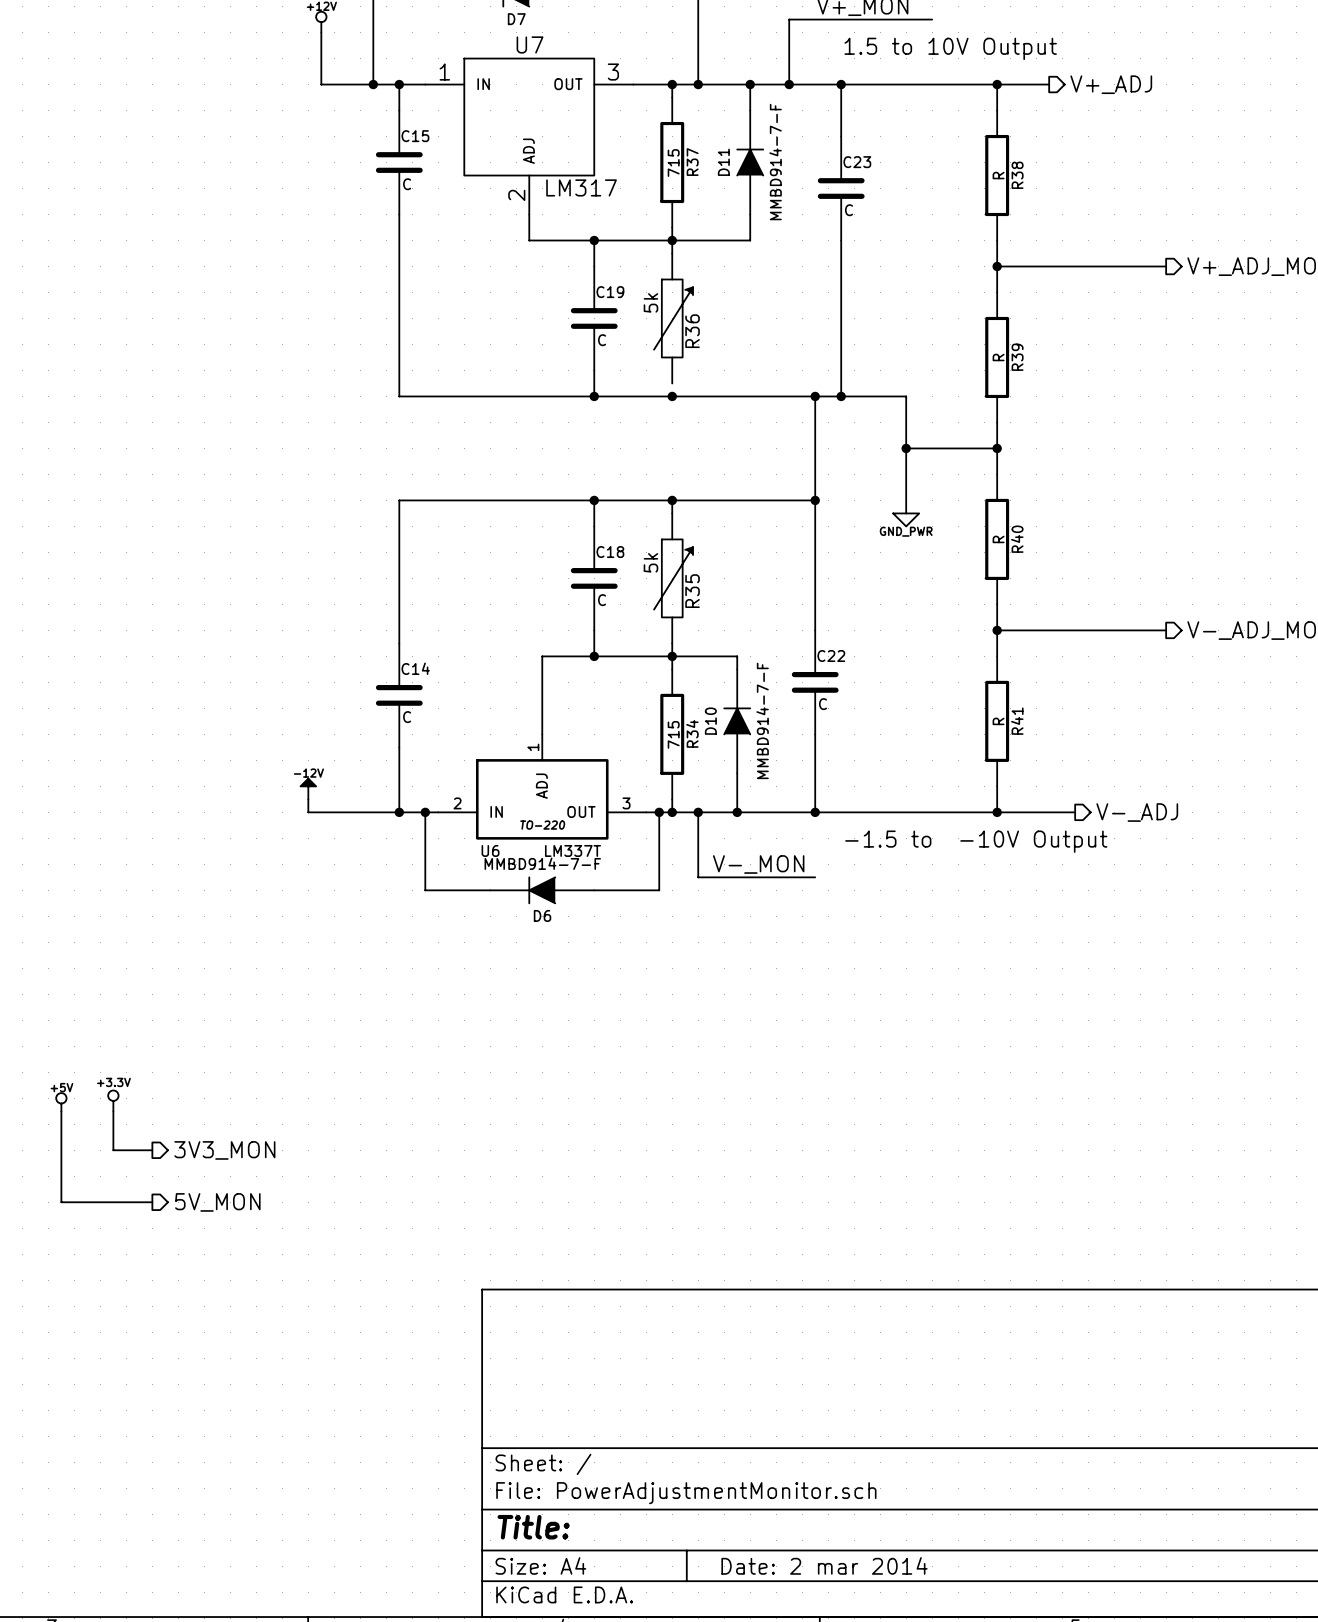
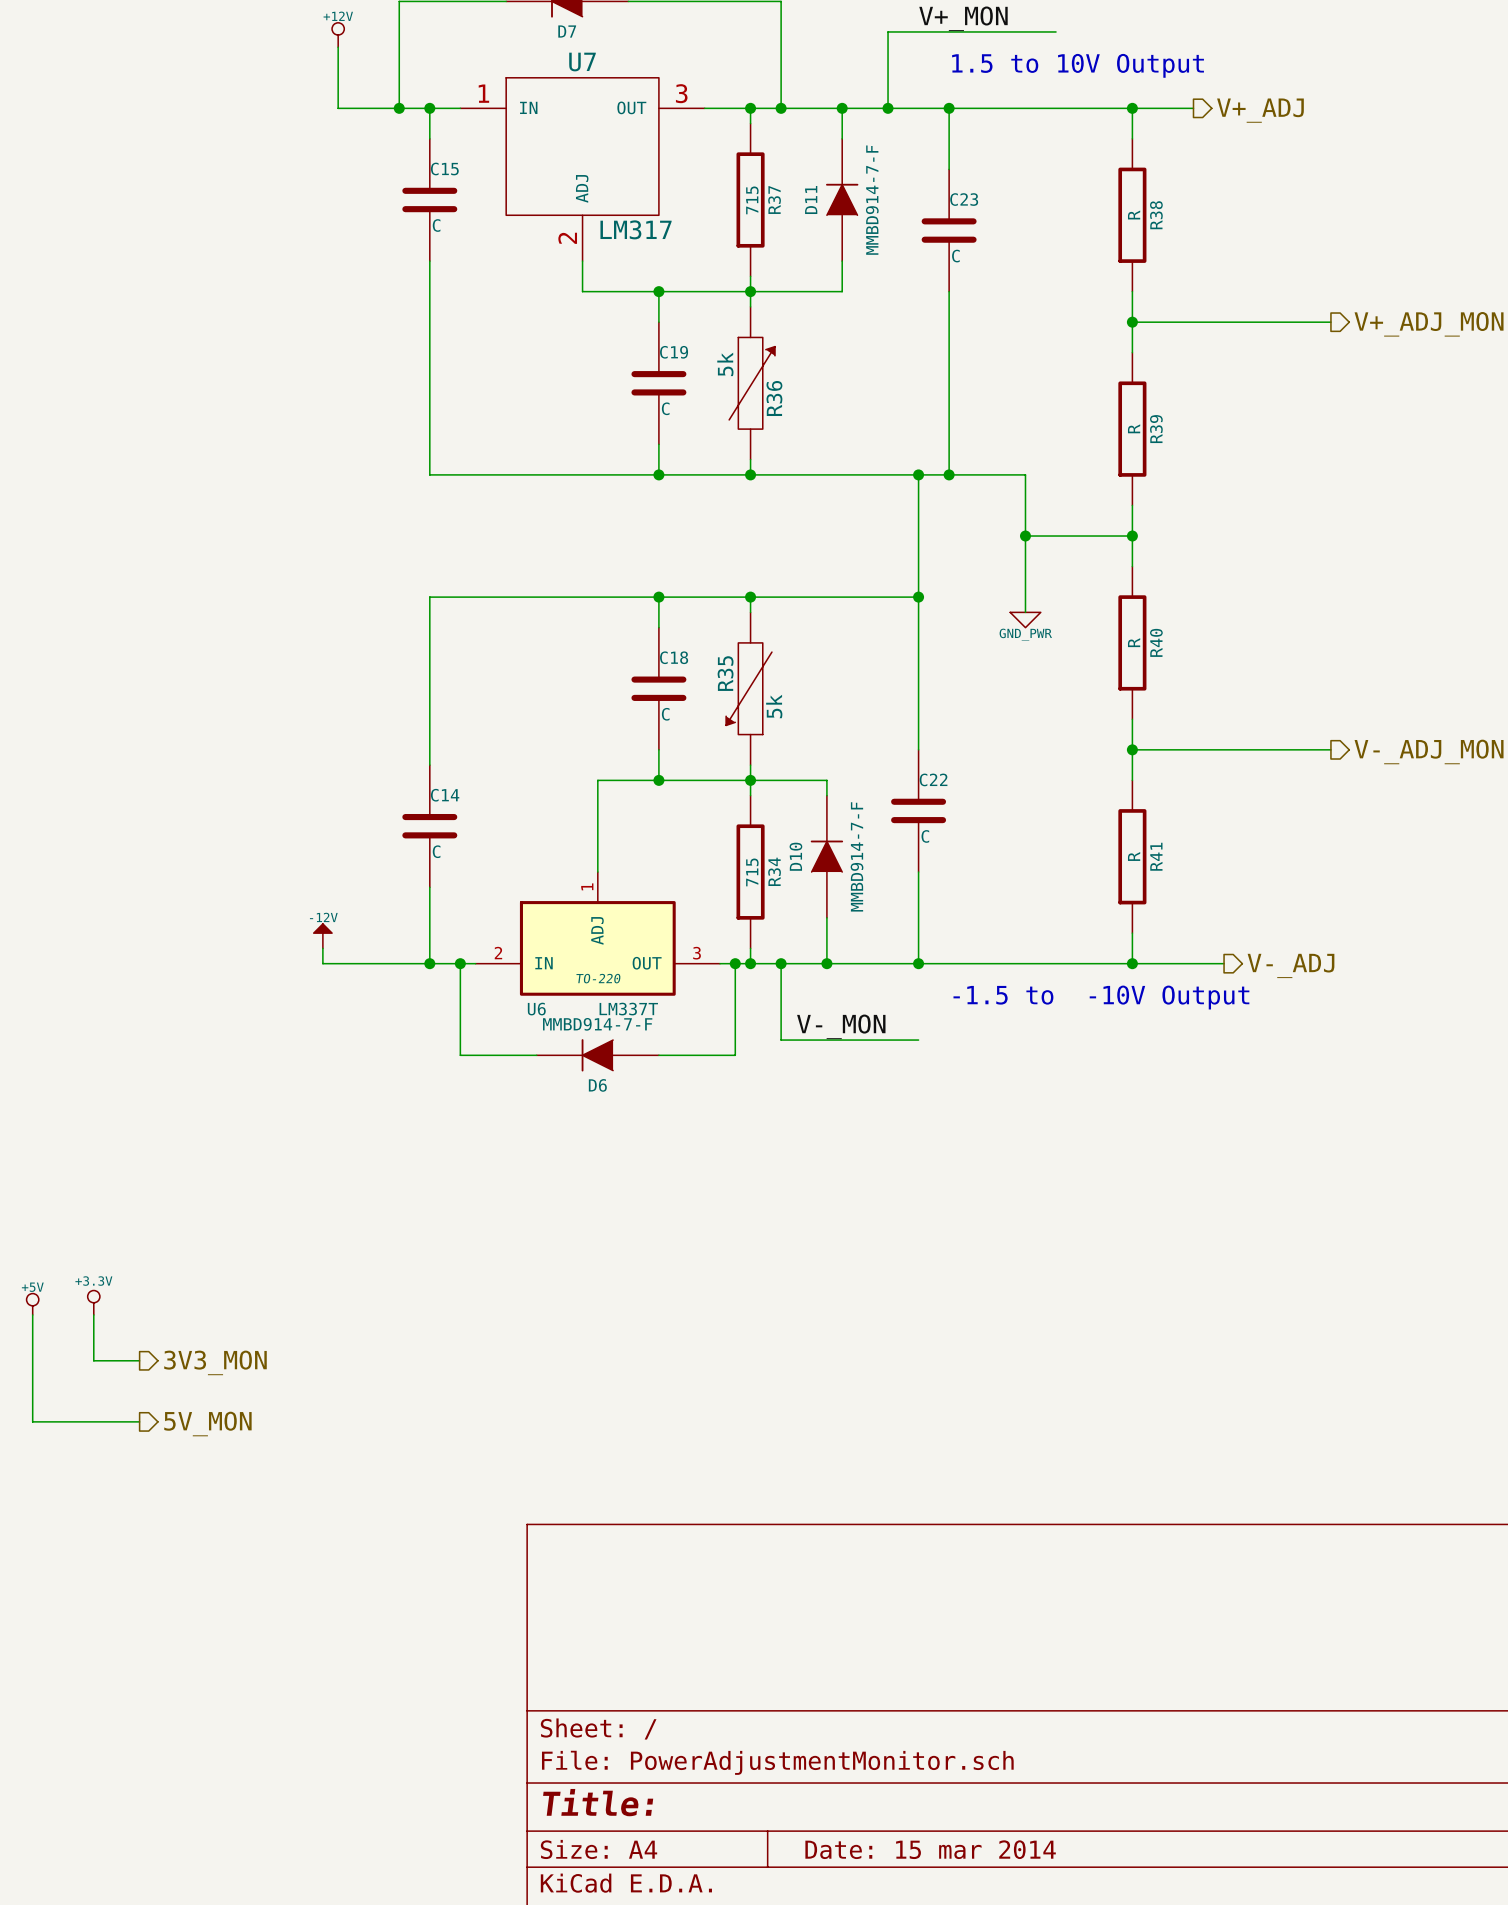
wire: none -> (750, 459) (750, 474)
R35 rotation: 0° (673, 578) -> 180° (749, 688)
title block: Date: 2 mar 2014 (824, 1565) -> Date: 15 mar 2014 (930, 1849)

